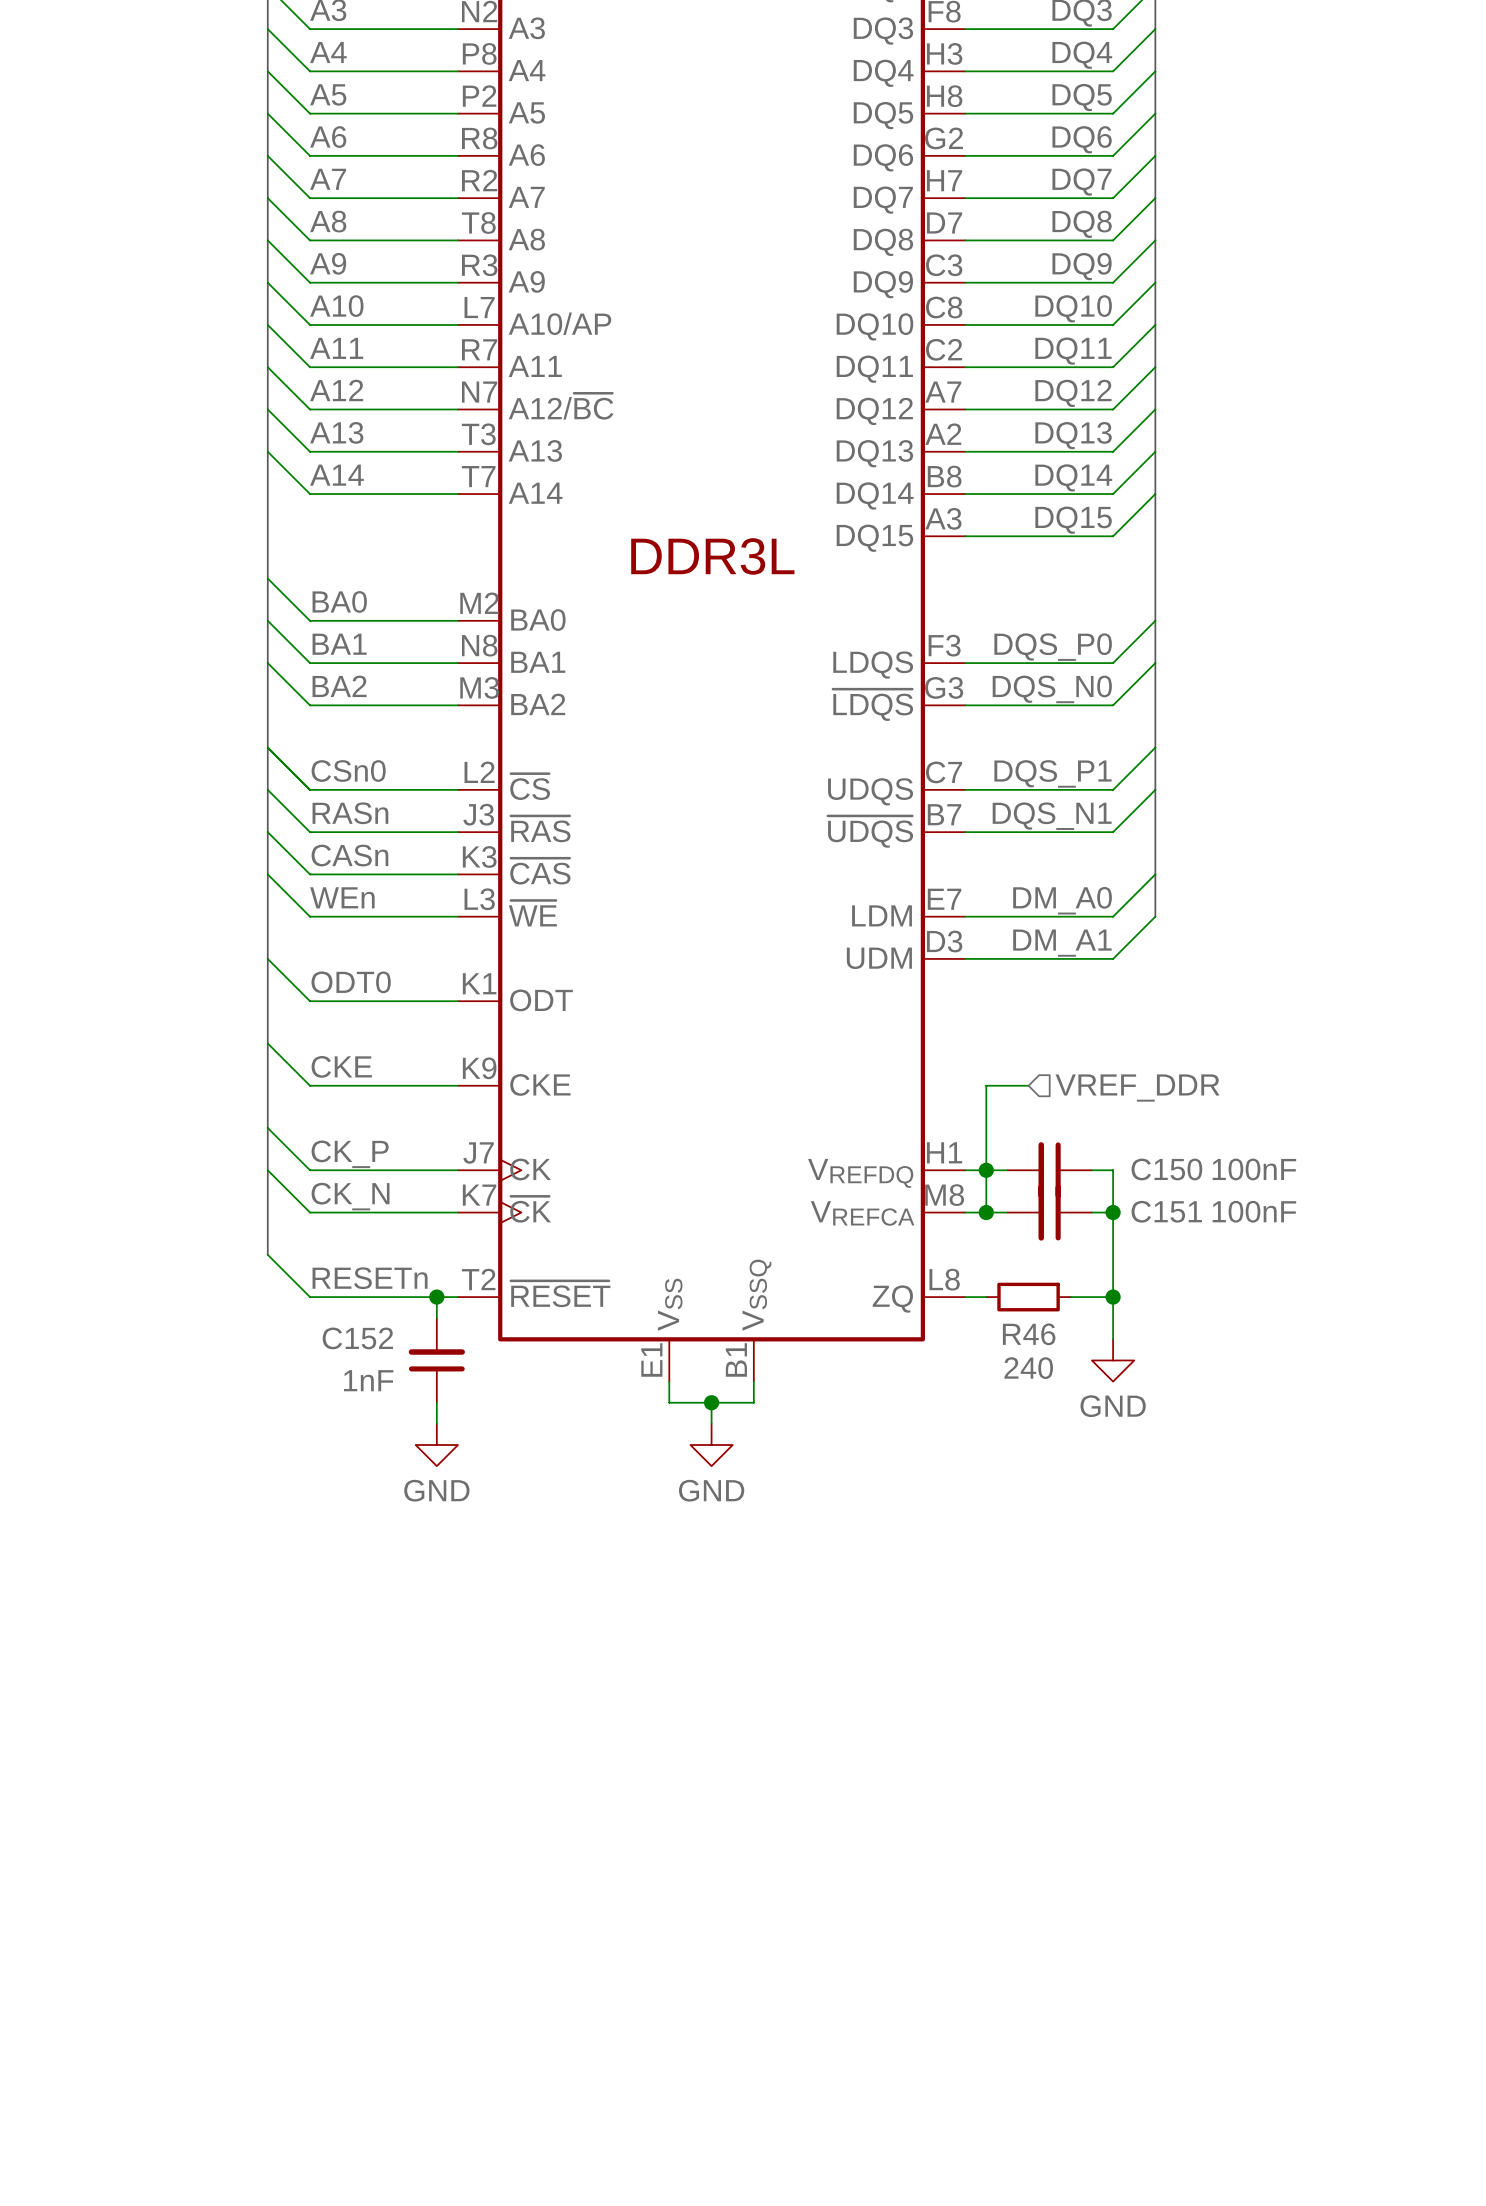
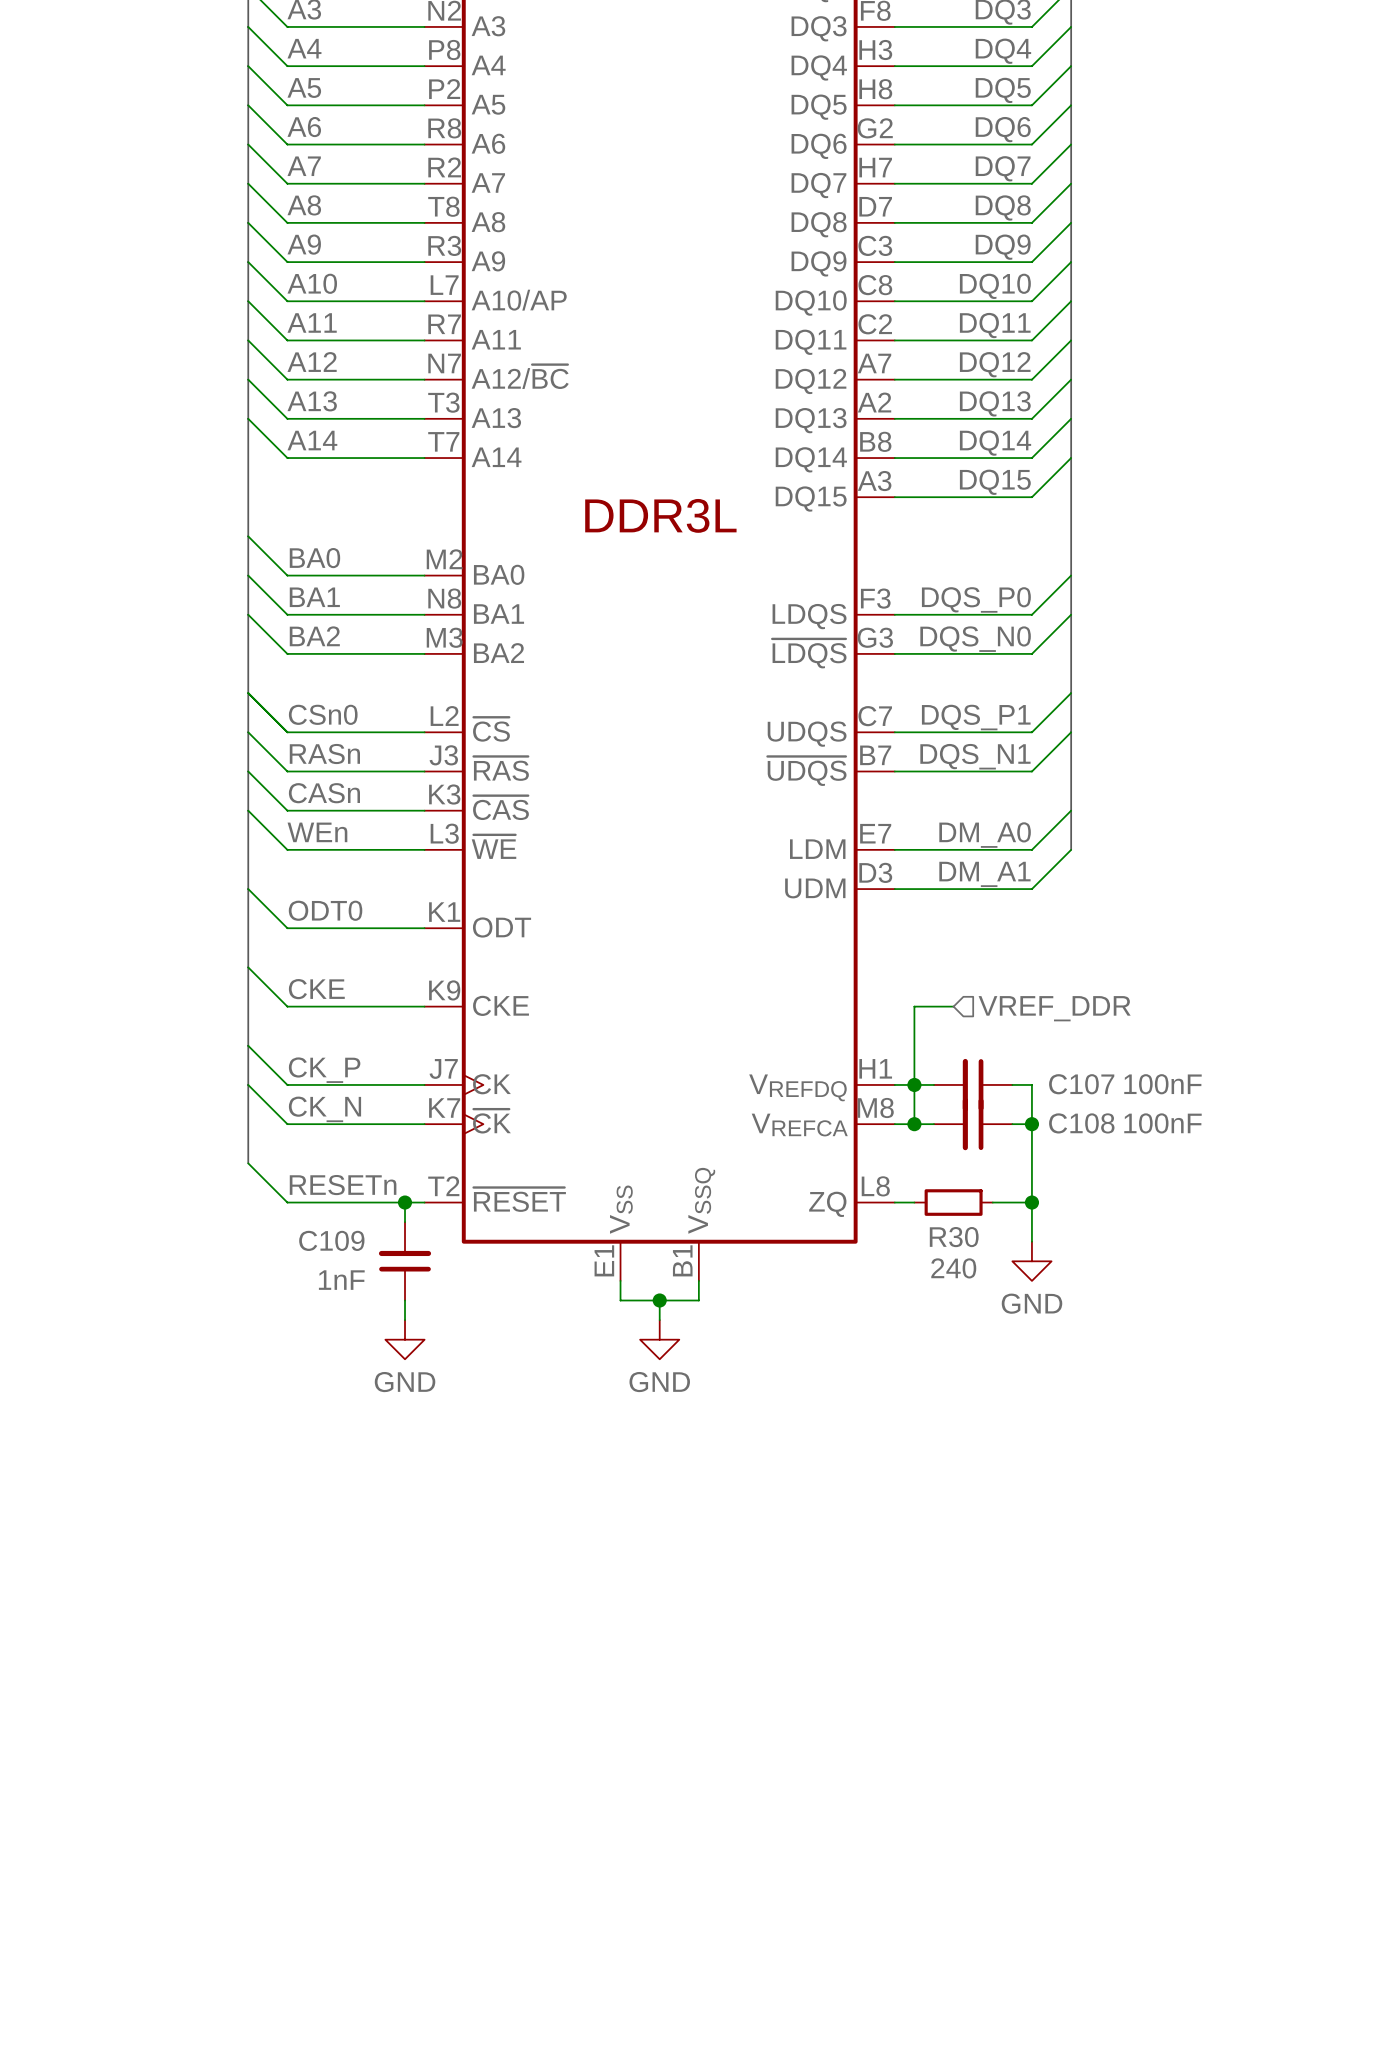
C150 name: C150 (1166, 1169) -> C107 (1081, 1084)
C151 name: C151 (1166, 1211) -> C108 (1081, 1123)
R46 name: R46 (1029, 1334) -> R30 (954, 1237)
C152 name: C152 (357, 1338) -> C109 (331, 1240)

